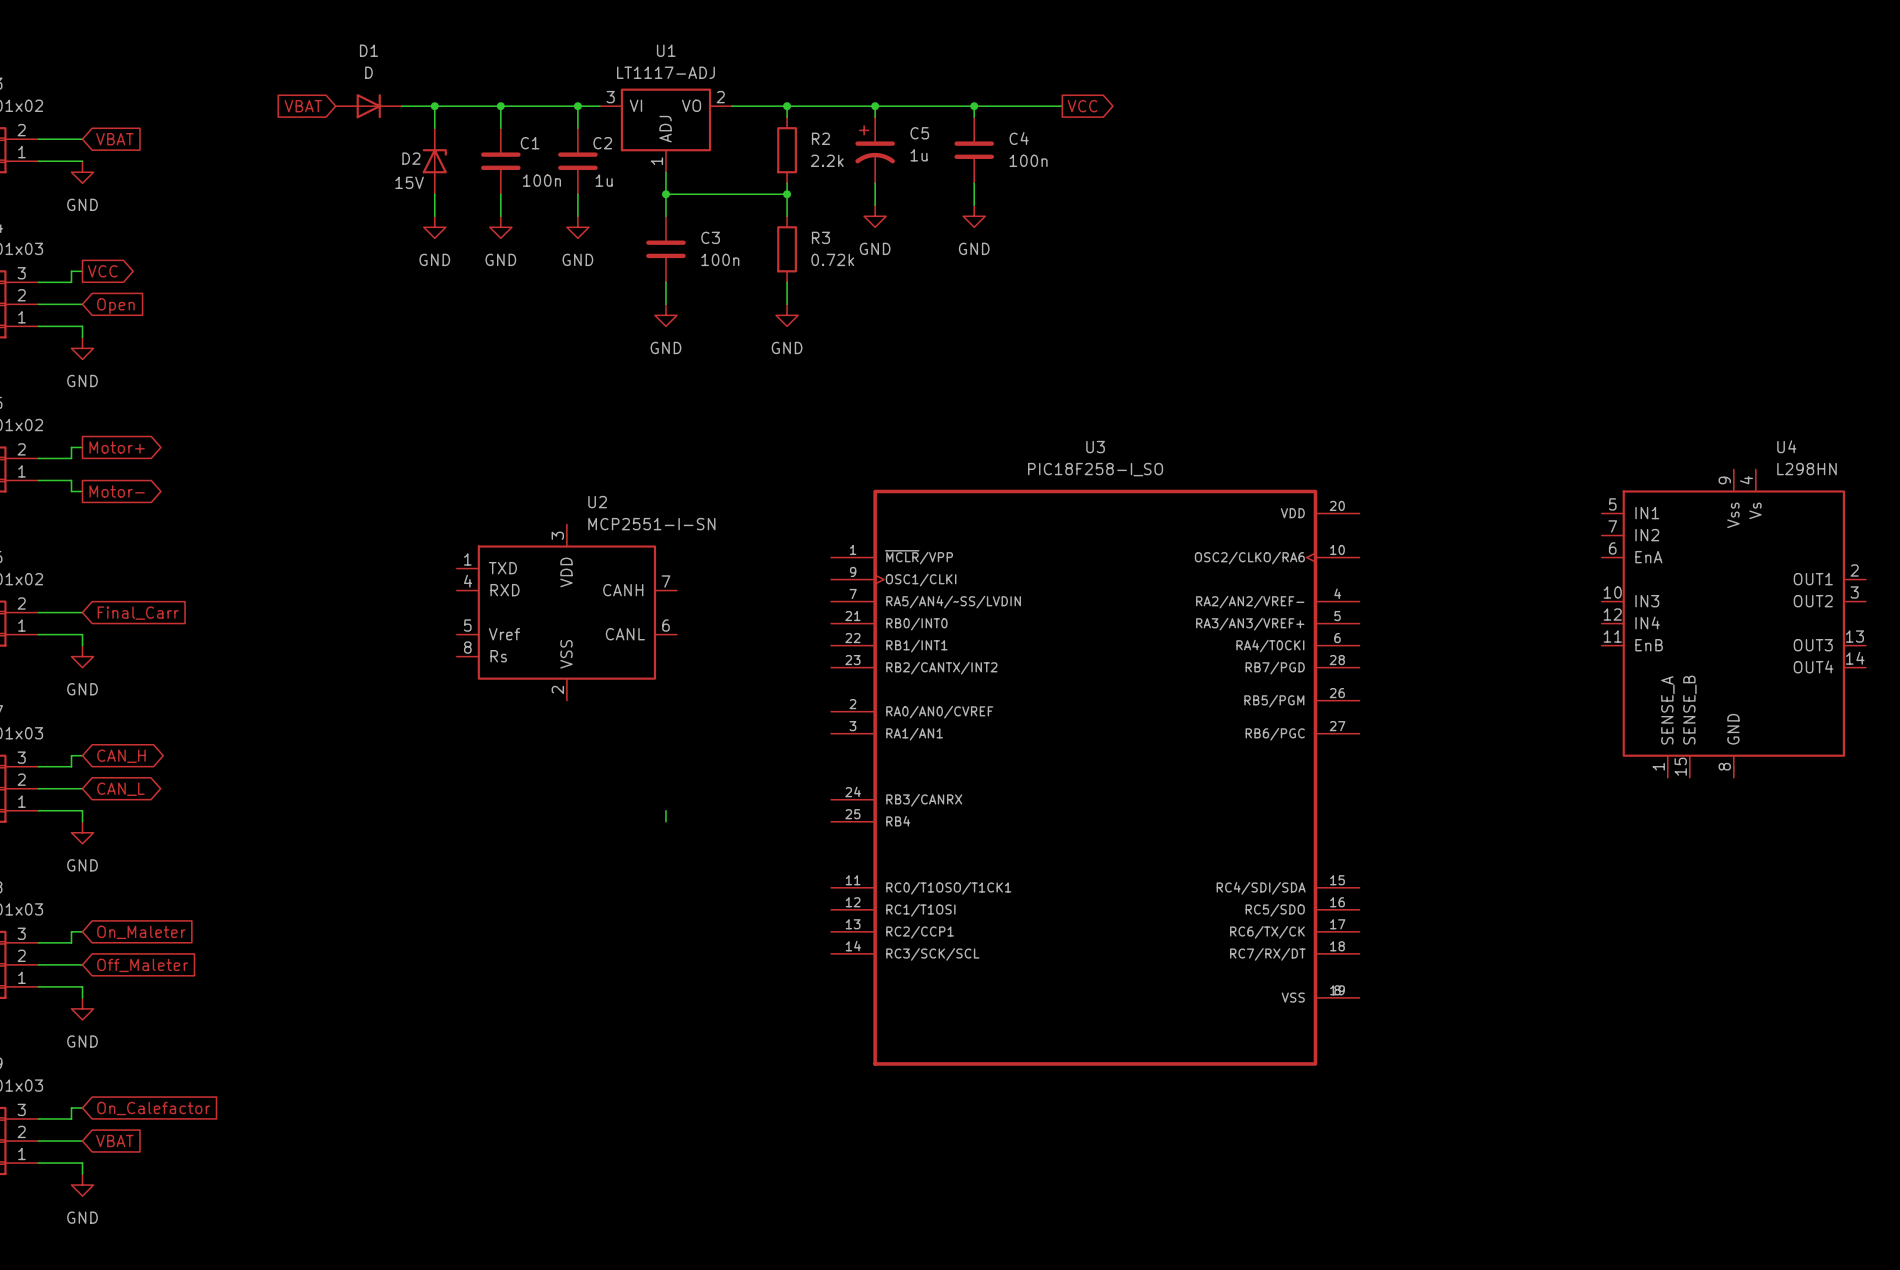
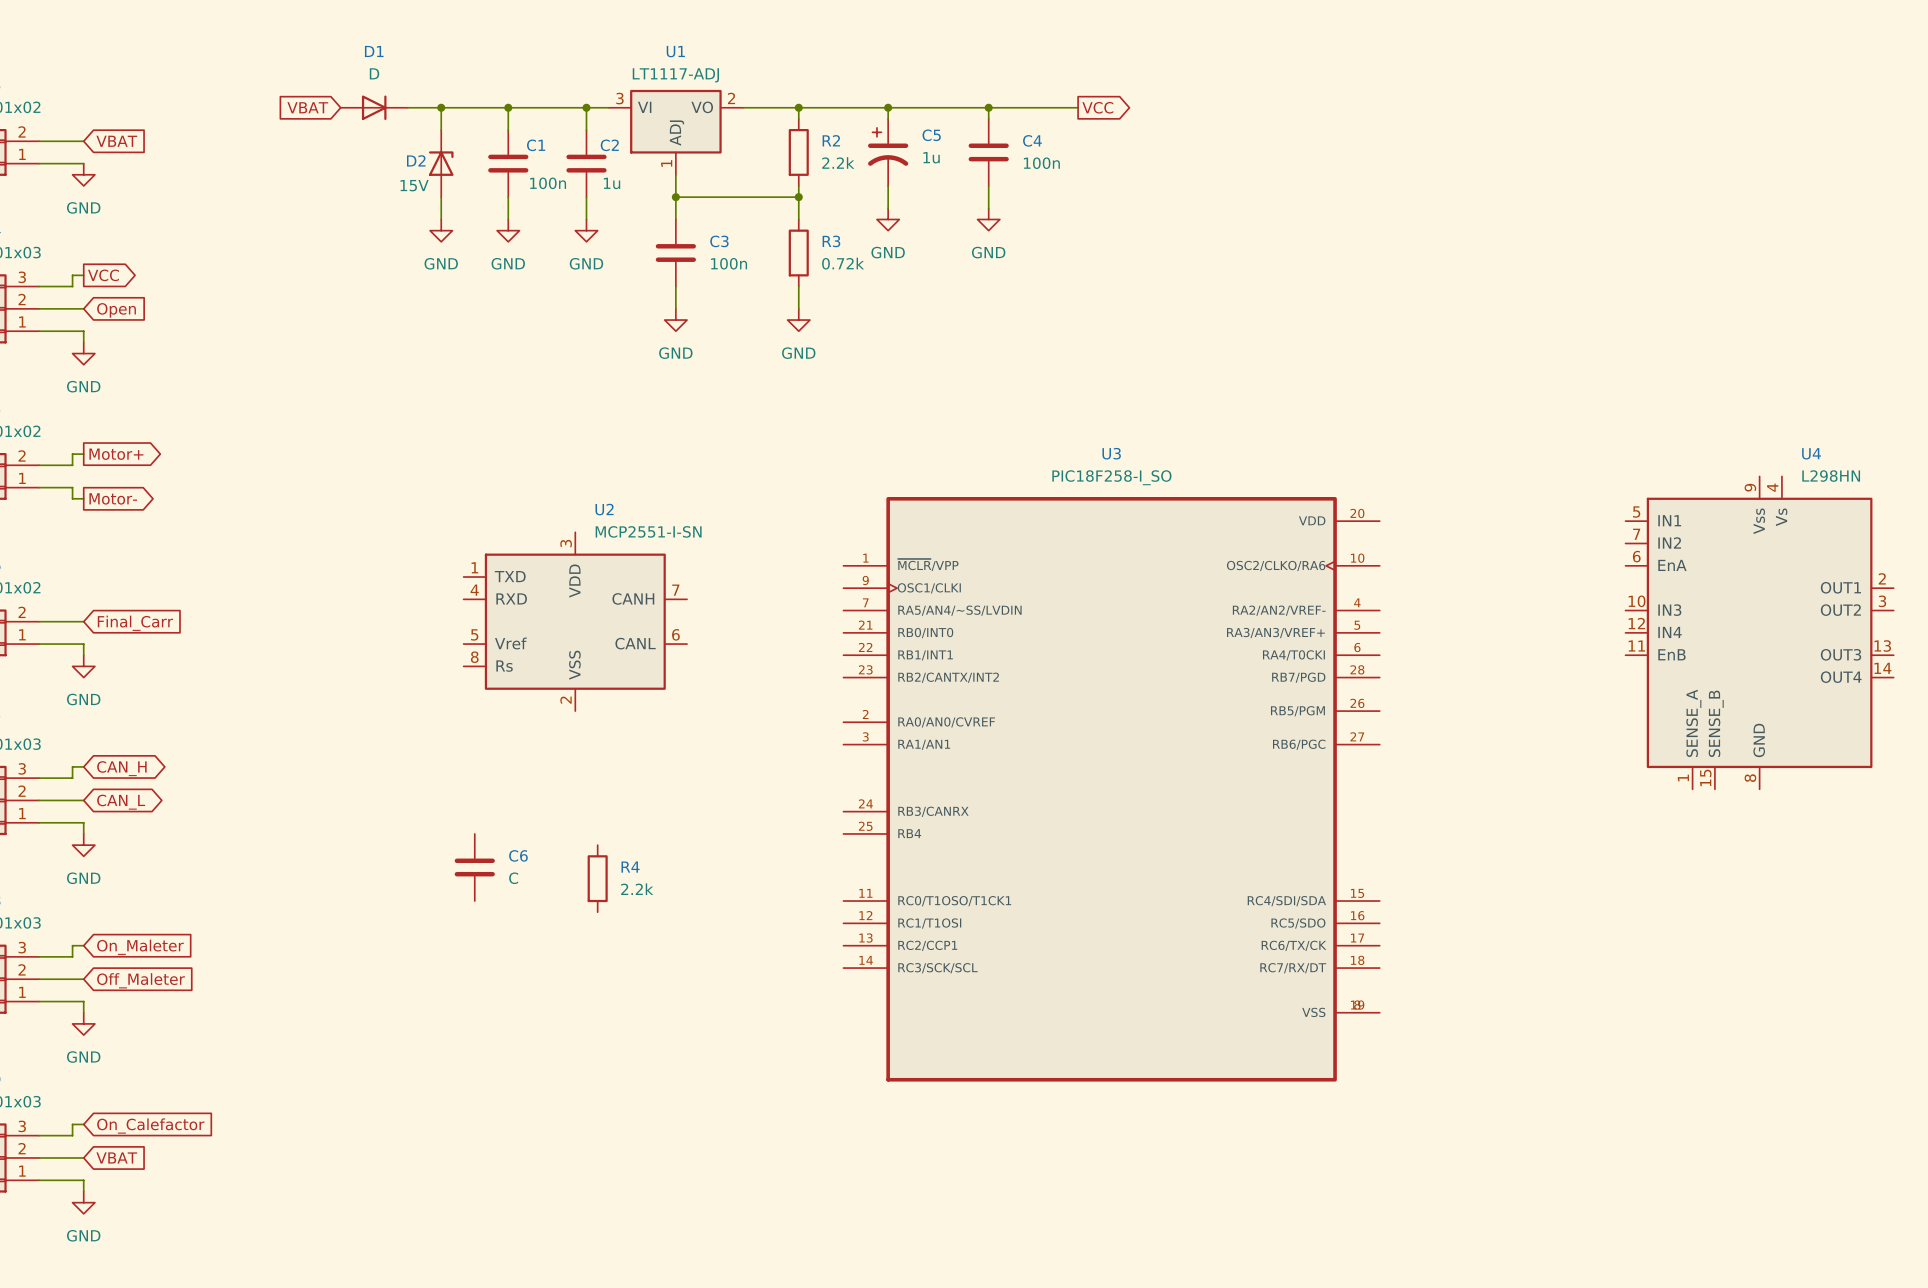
wire: (665, 810) (665, 821) -> none
C6: none -> C (474, 867)
R4: none -> 2.2k (597, 878)

